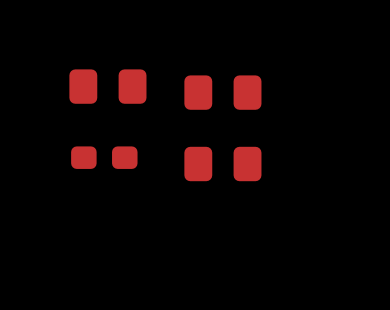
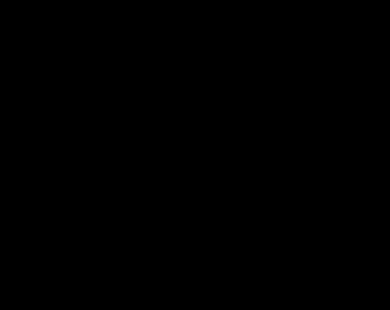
part: (107, 86) -> none
part: (222, 92) -> none
part: (104, 157) -> none
part: (222, 164) -> none

